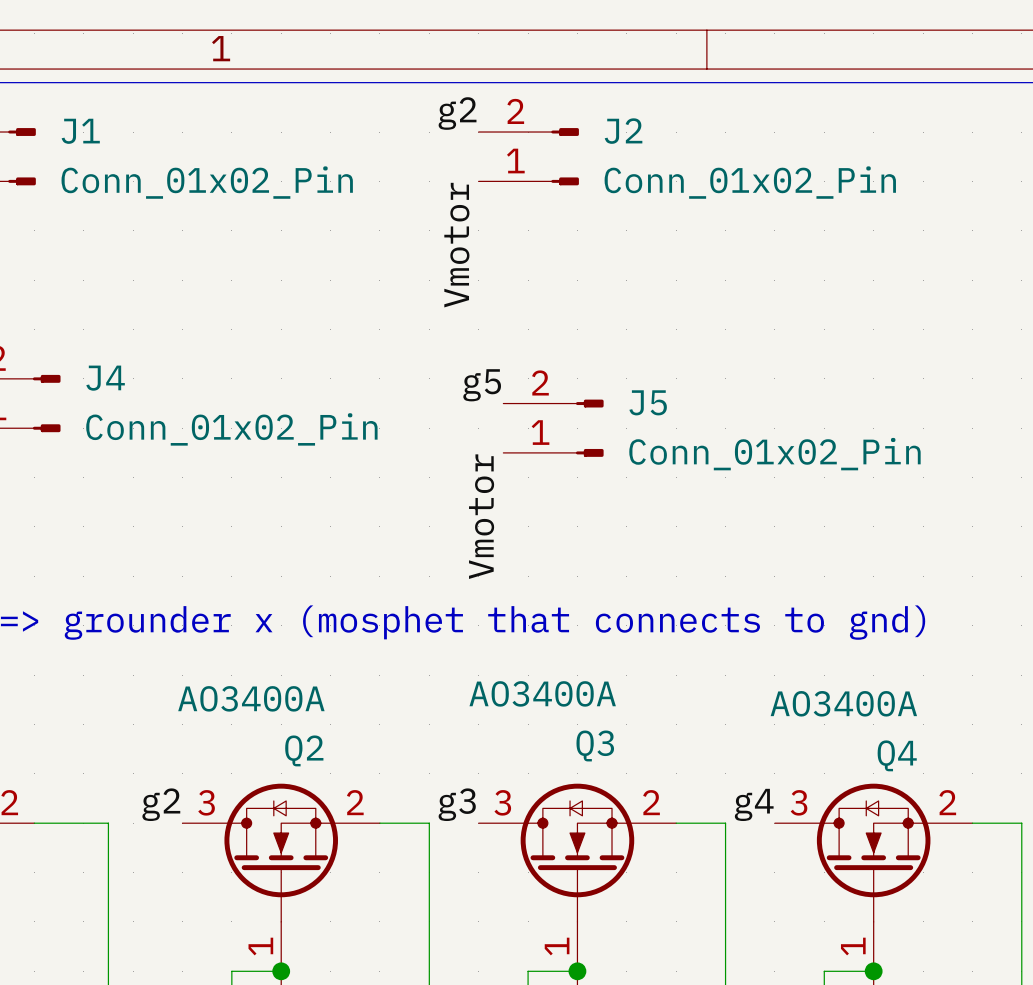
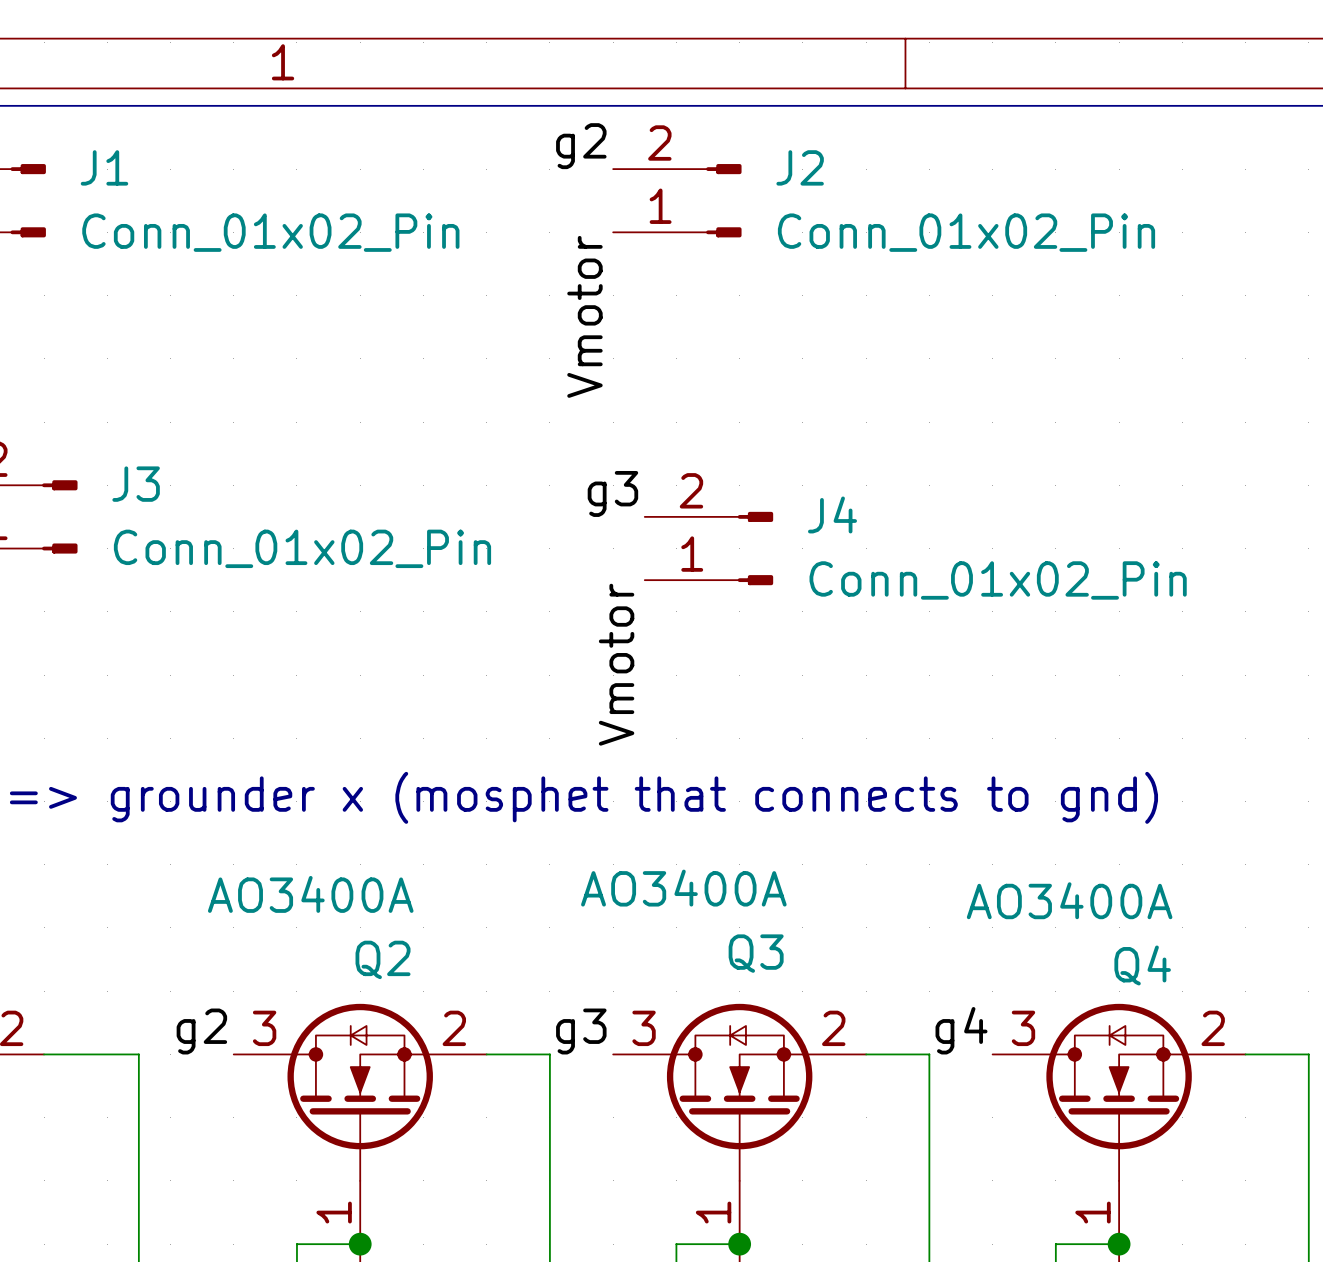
J4 name: J4 (105, 378) -> J3 (136, 484)
label: g5 (482, 385) -> g3 (612, 493)
J5 name: J5 (648, 402) -> J4 (832, 514)

